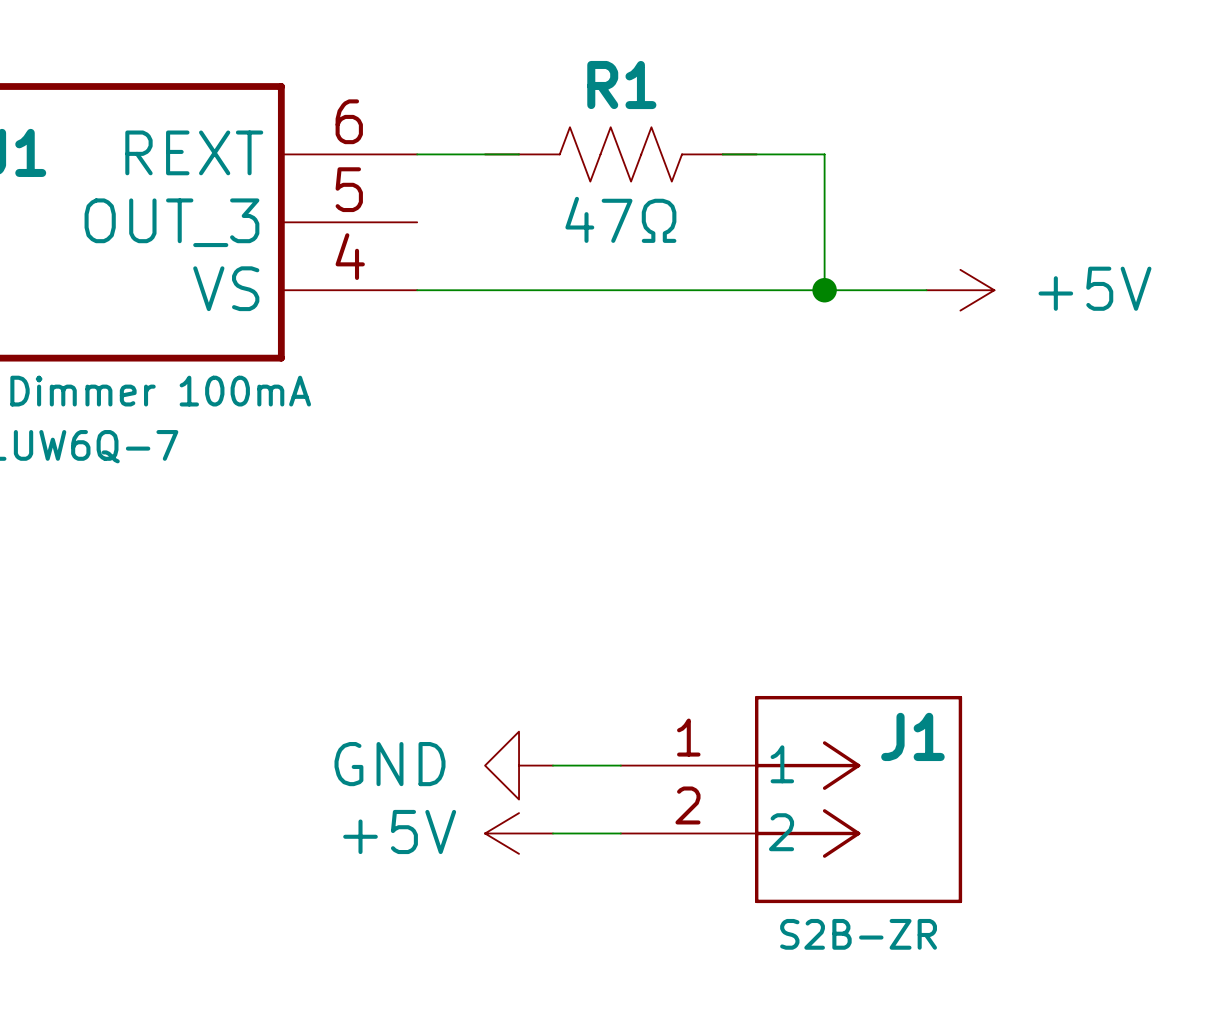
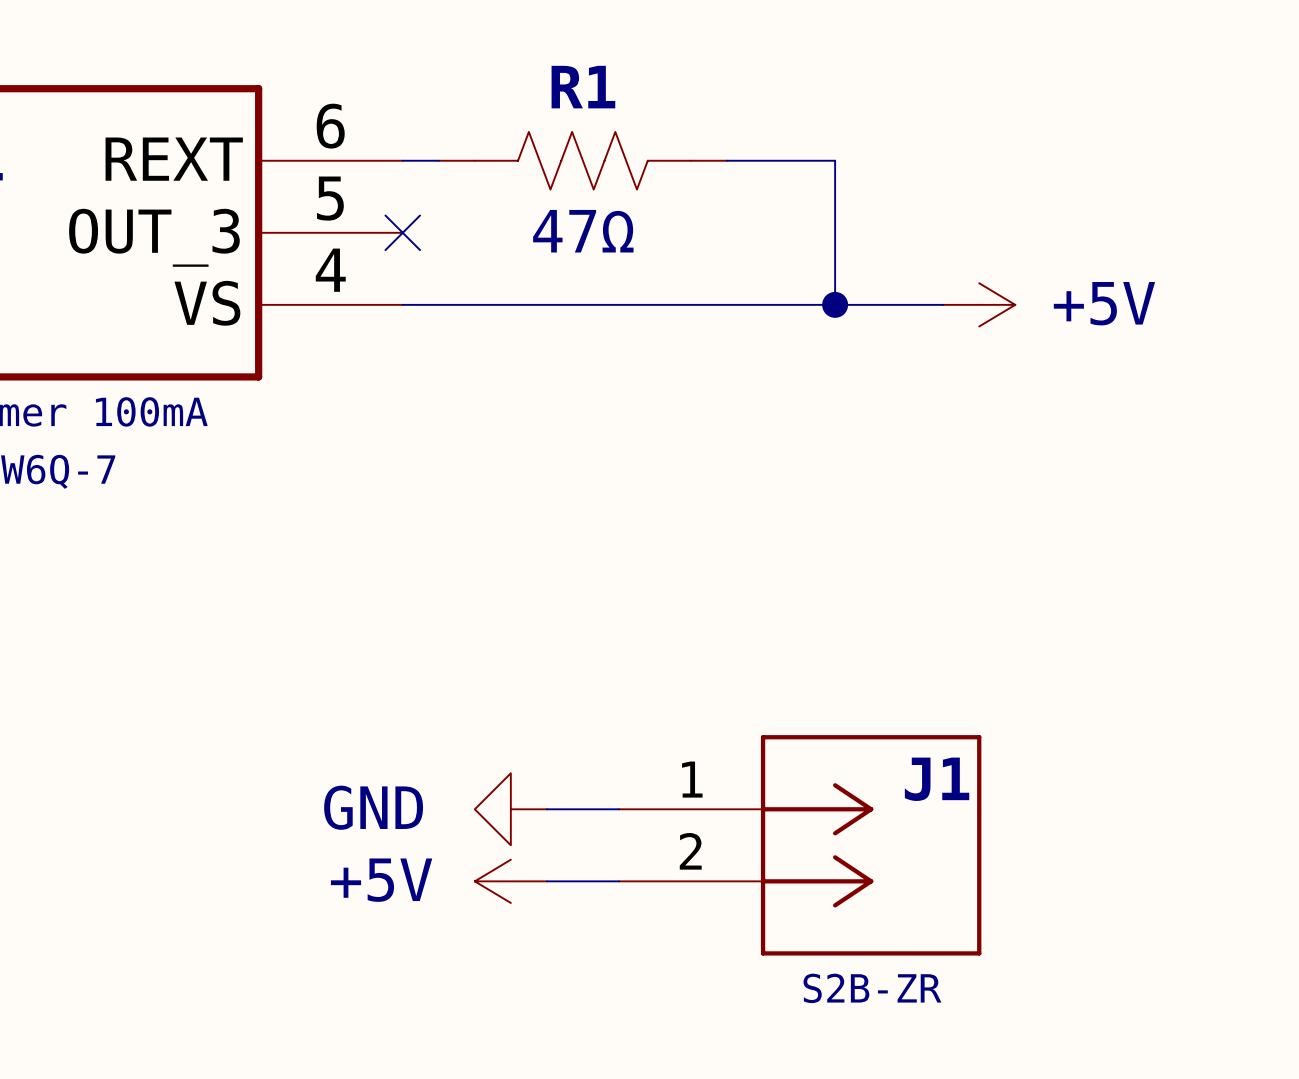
R1 position: (620, 154) -> (582, 160)
no-connect mark: none -> (402, 232)
J1 symbol: [620, 695, 963, 904] -> [618, 735, 982, 956]

